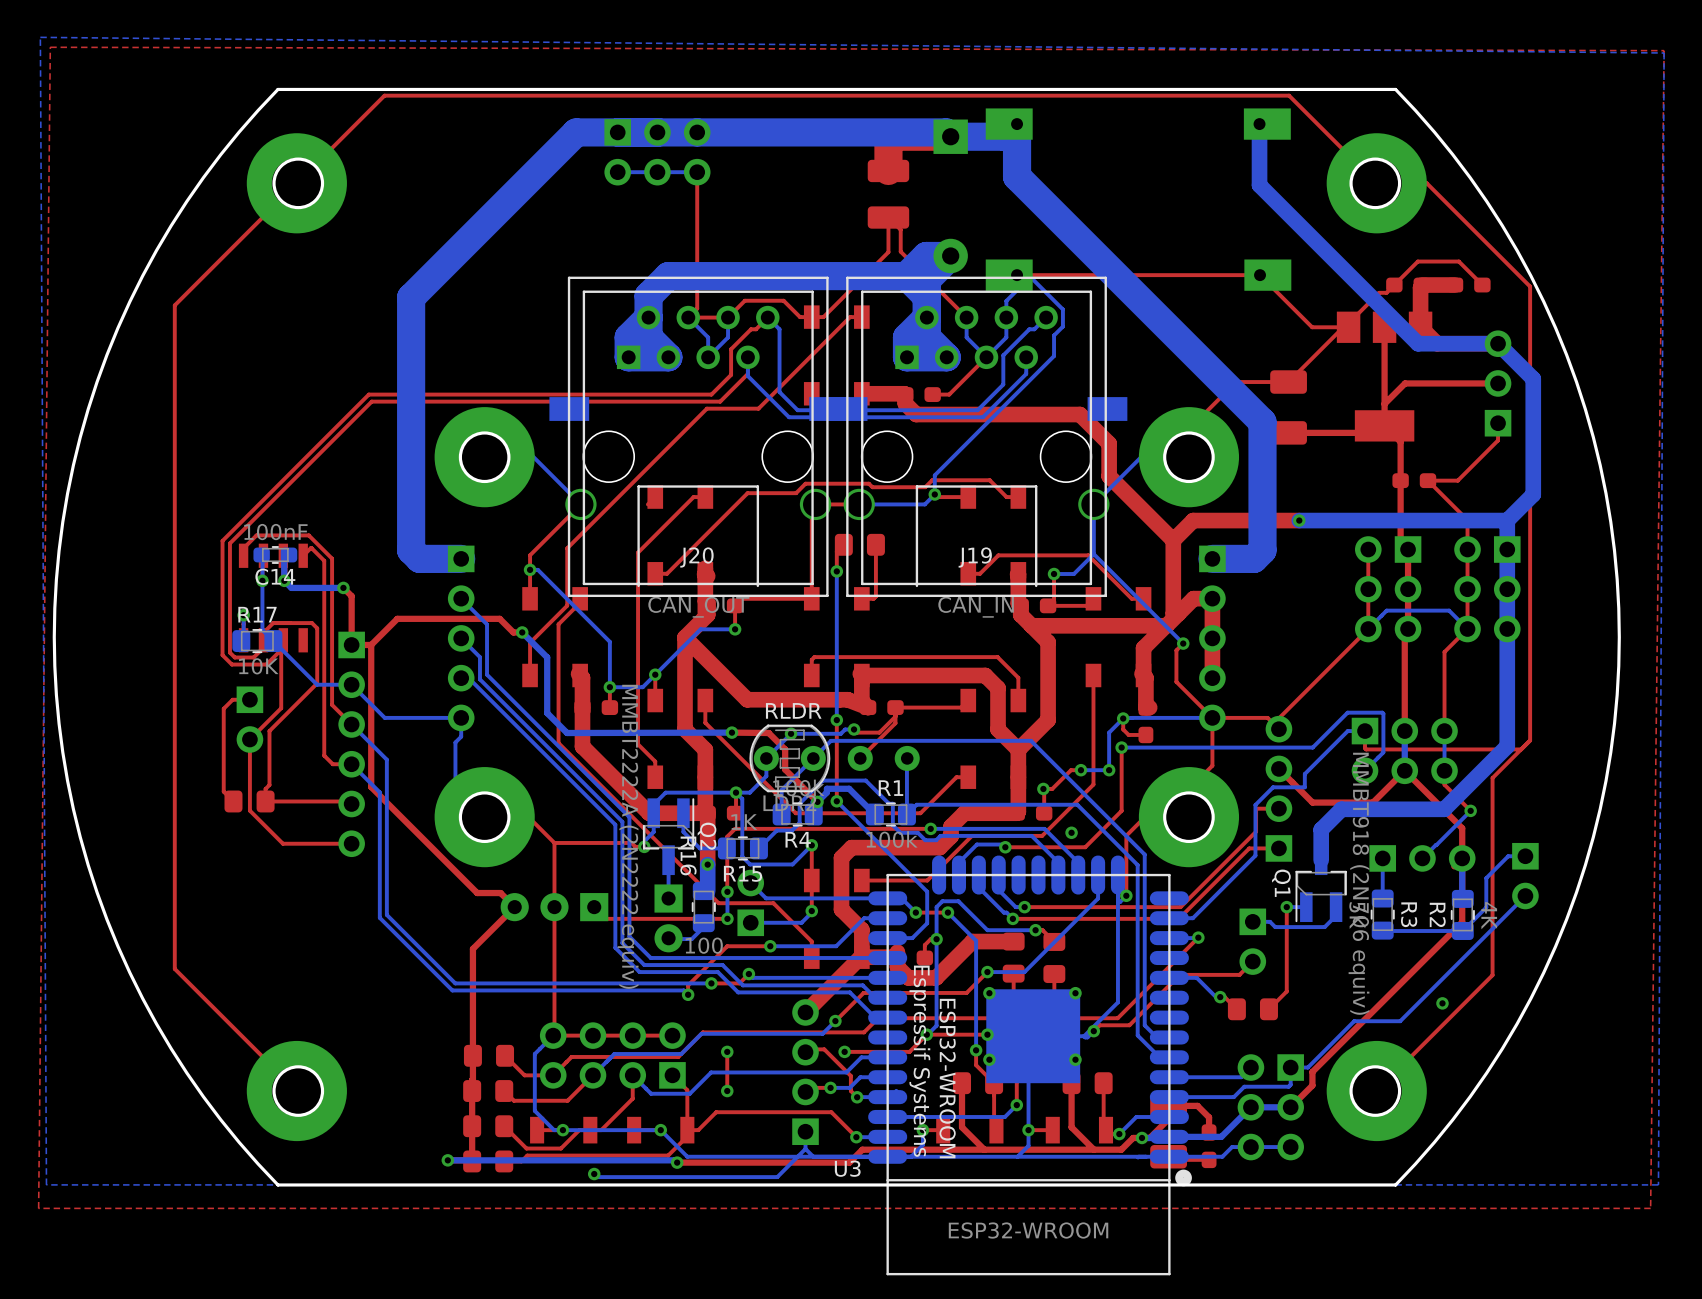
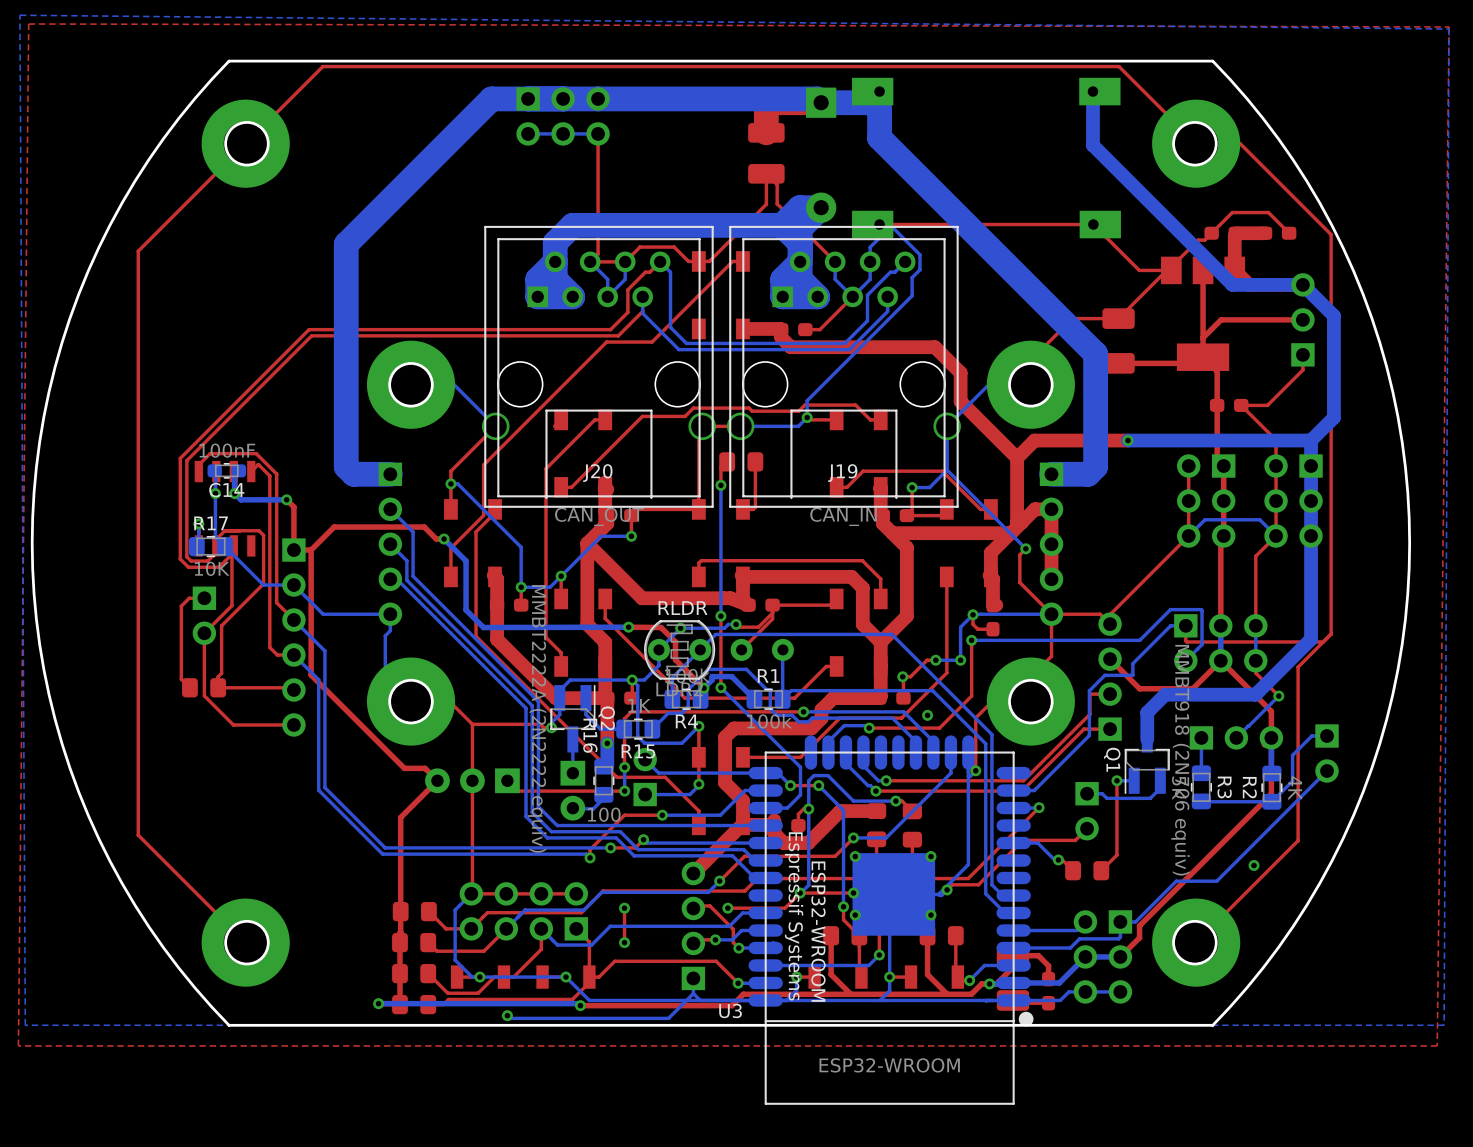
J20 footprint: [549, 276, 850, 598] -> [481, 225, 716, 508]
J19 footprint: [827, 276, 1128, 598] -> [726, 225, 961, 508]

